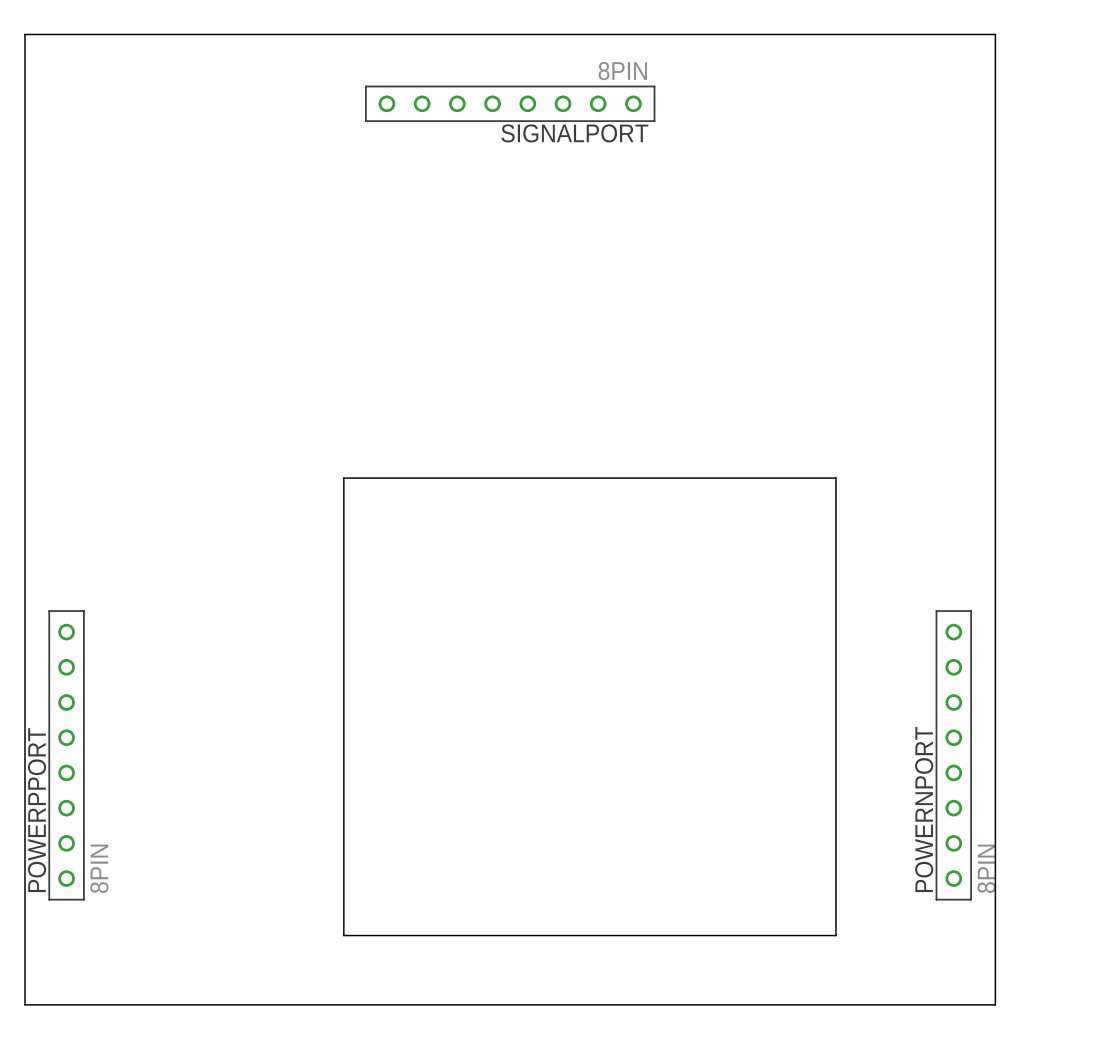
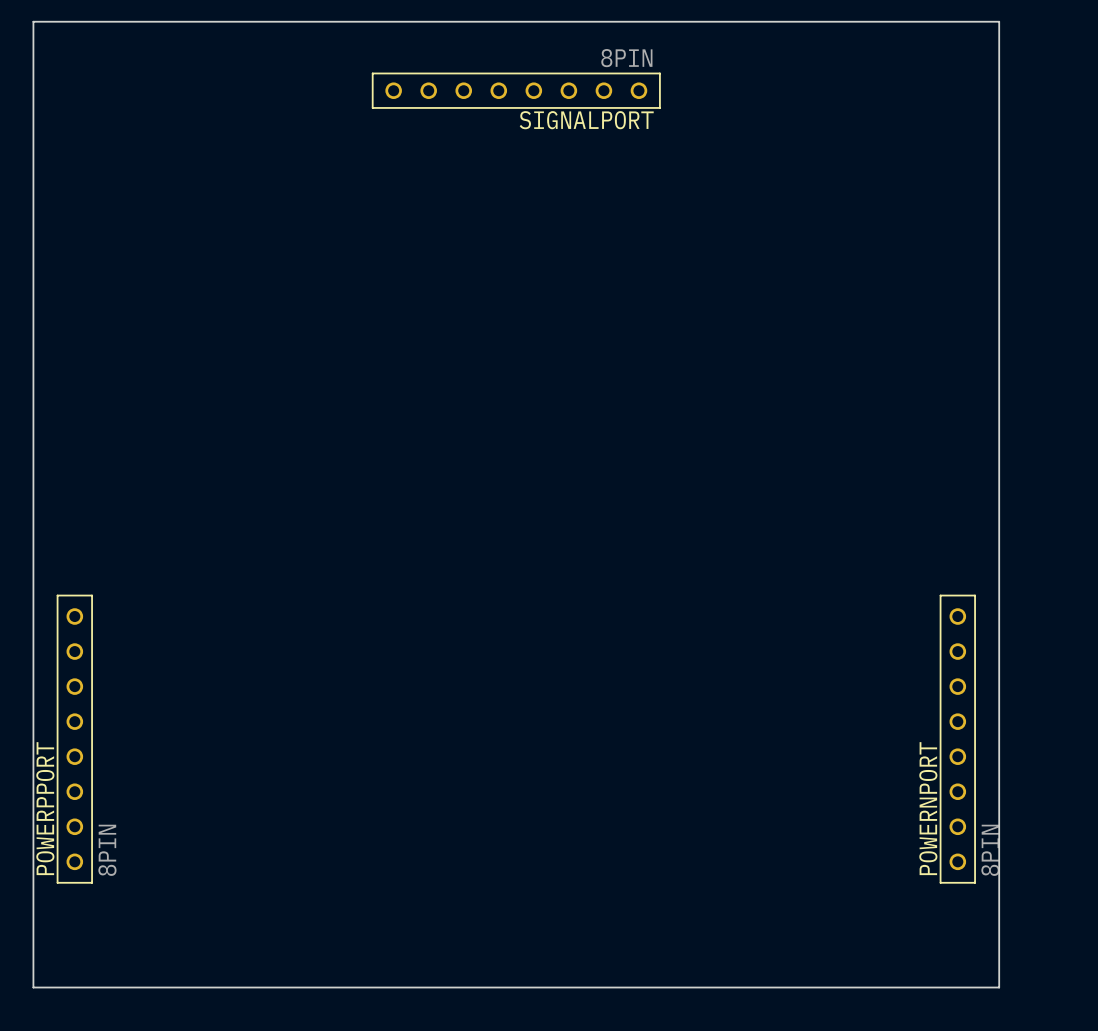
board edge: (343, 478) (343, 935) (835, 935) (835, 478) (343, 478) -> none

